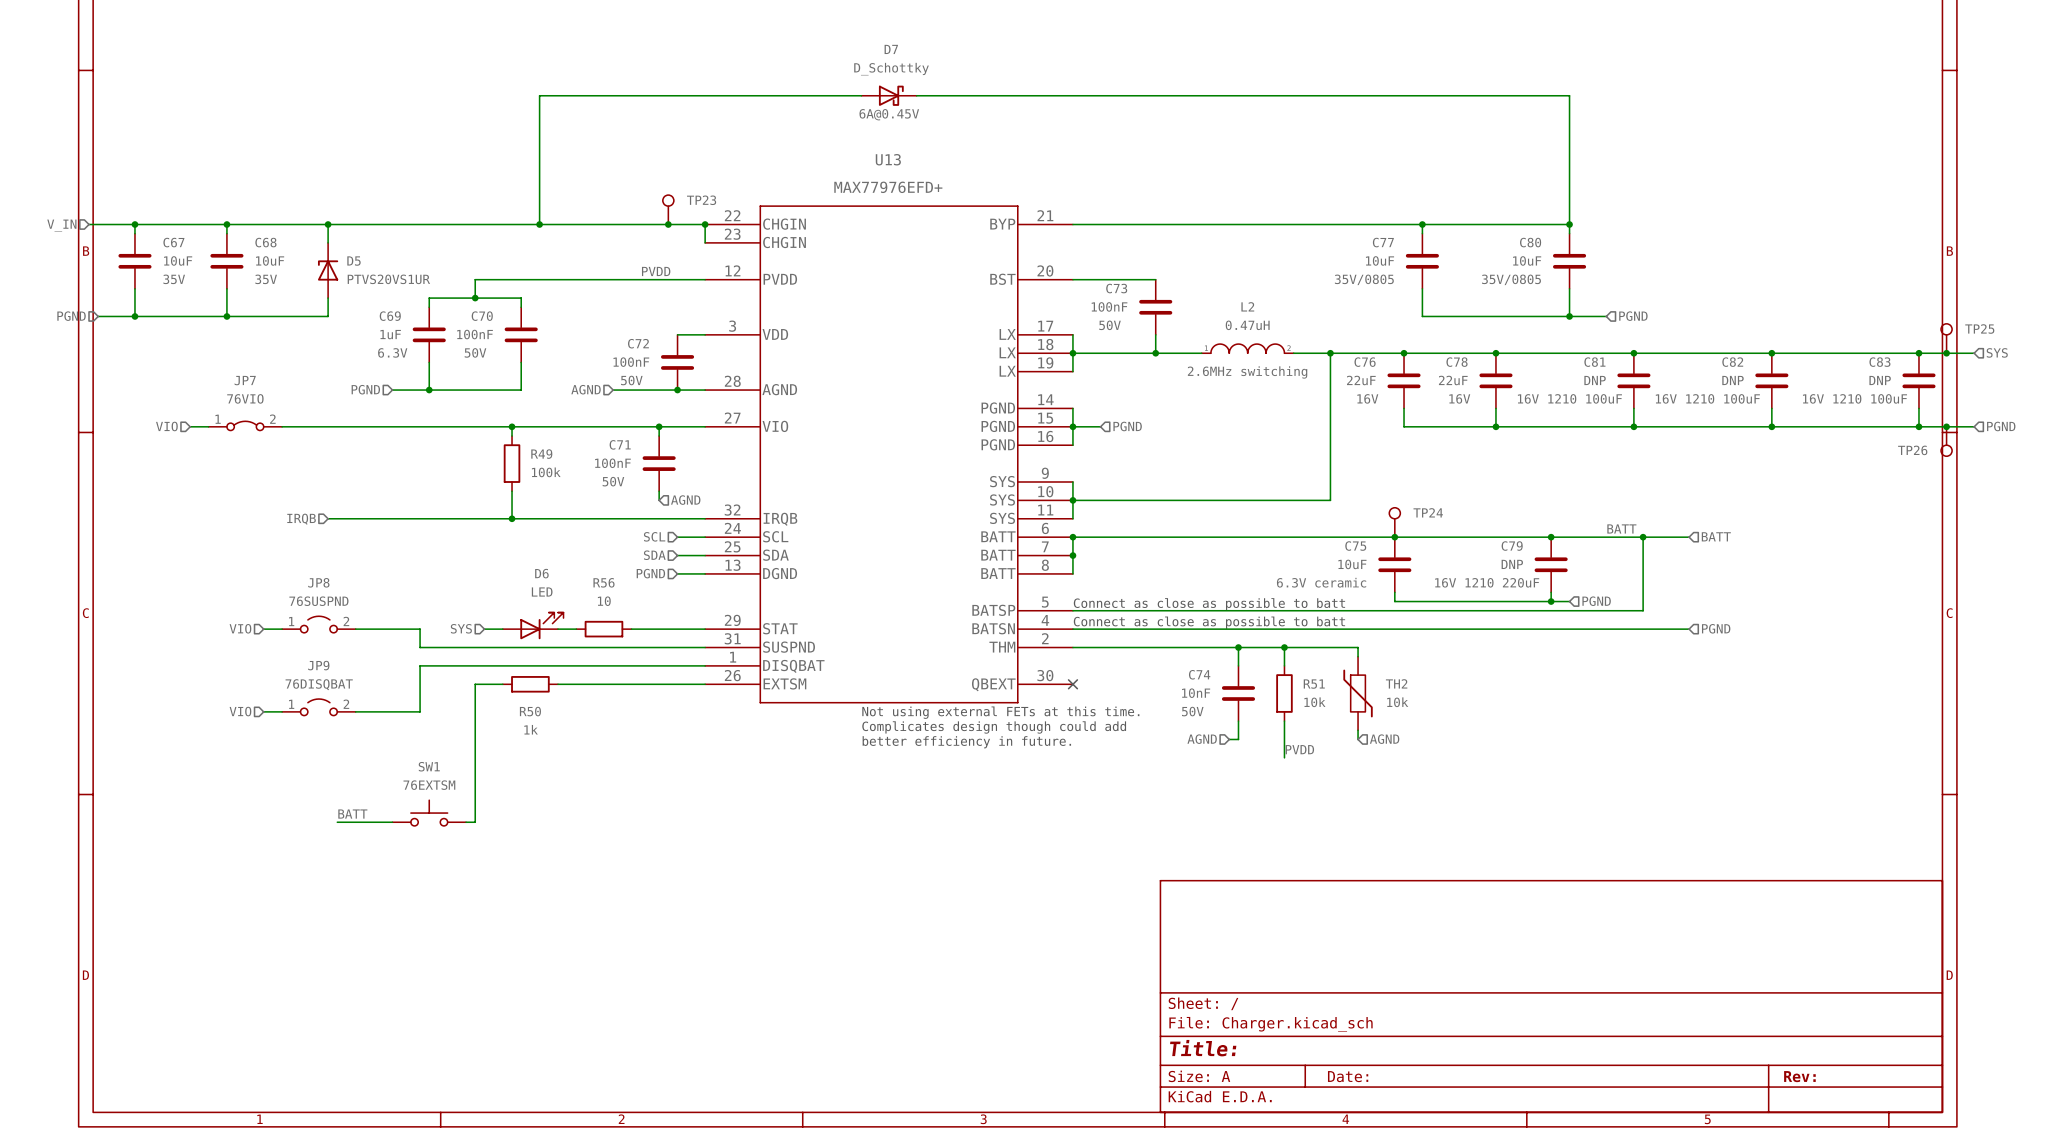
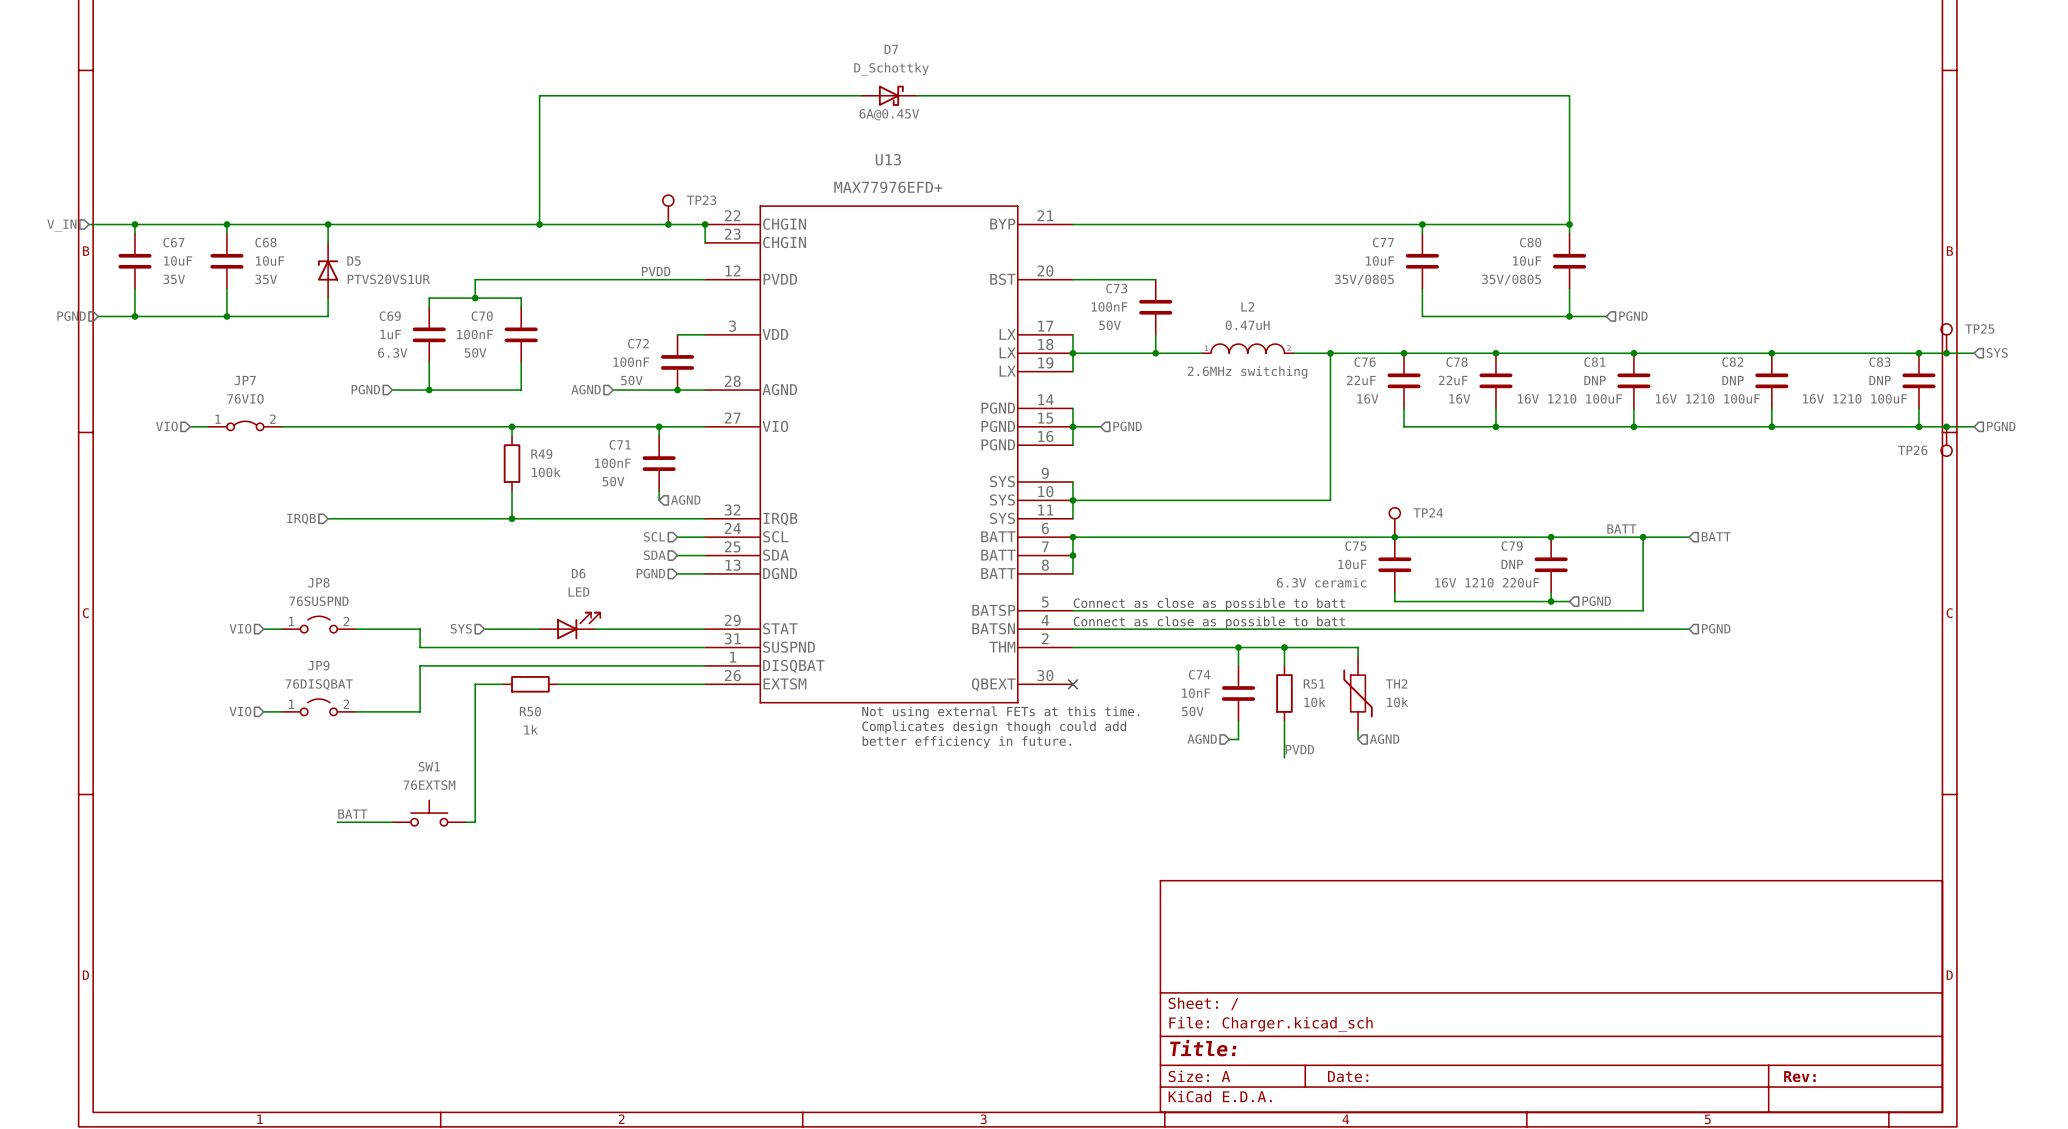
D6 position: (533, 625) -> (569, 625)
wire: none -> (594, 629) (631, 629)
R56: 10 (603, 629) -> none

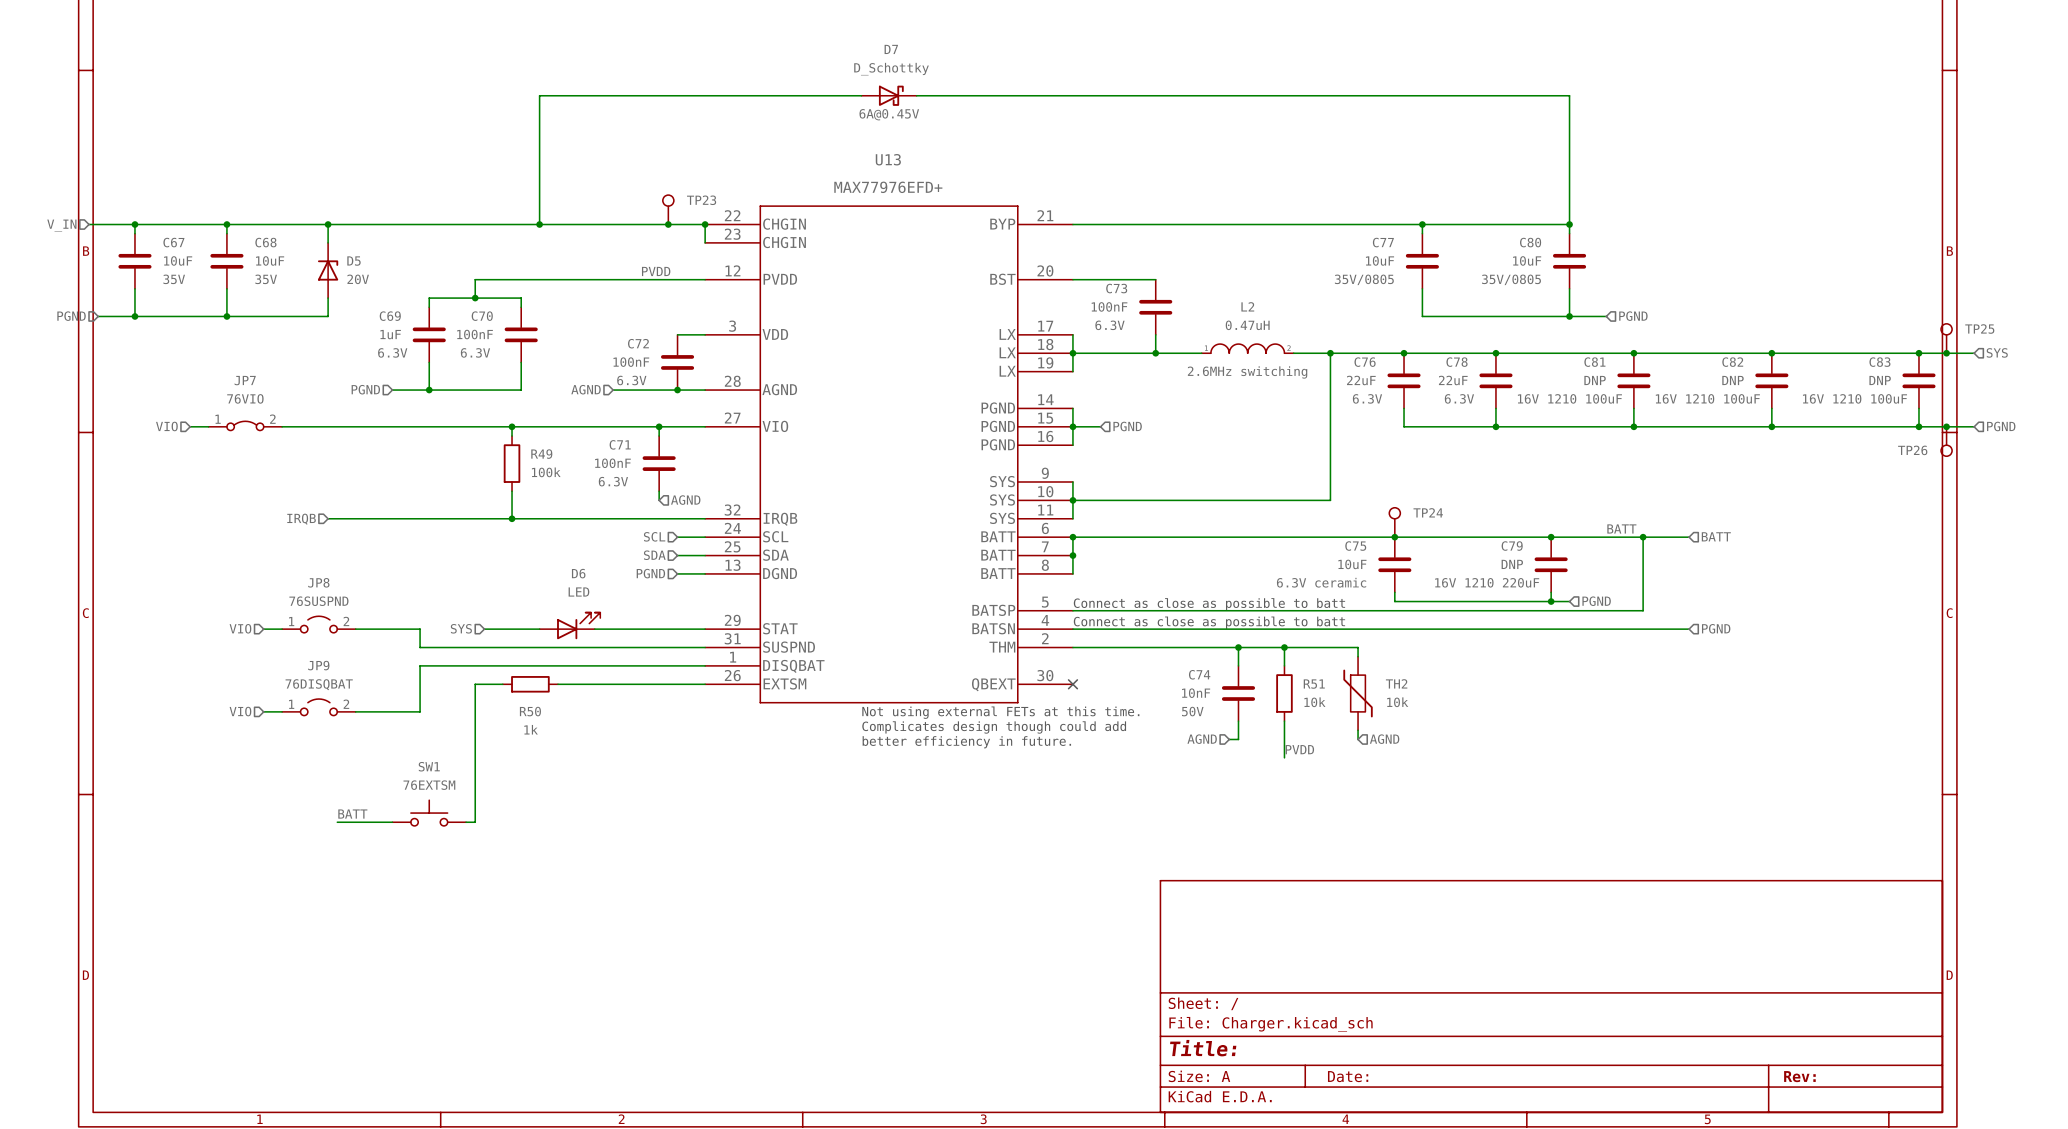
D5 flip: as is (328, 270) -> left-right (328, 270)
D5 value: PTVS20VS1UR (388, 279) -> 20V (358, 279)
C73 text: 50V (1110, 325) -> 6.3V (1109, 325)
C70 text: 50V (475, 352) -> 6.3V (475, 352)
C72 text: 50V (631, 380) -> 6.3V (631, 380)
C76 text: 16V (1367, 398) -> 6.3V (1367, 398)
C78 text: 16V (1459, 398) -> 6.3V (1459, 398)
C71 text: 50V (613, 481) -> 6.3V (613, 481)

